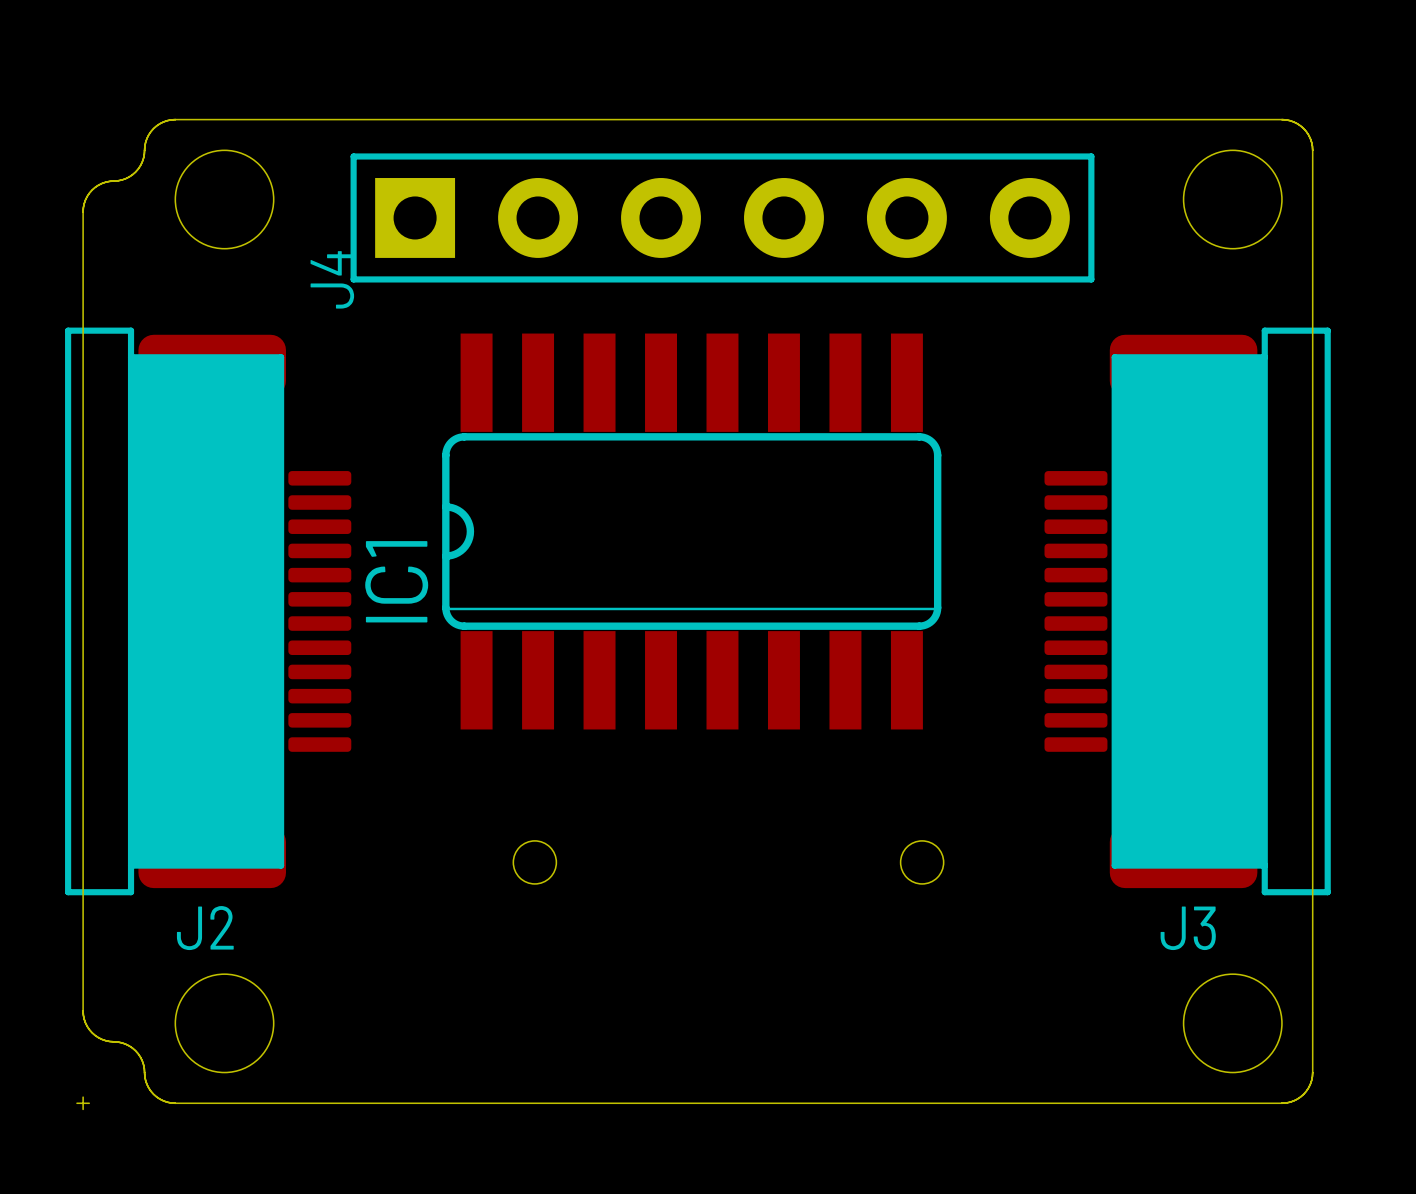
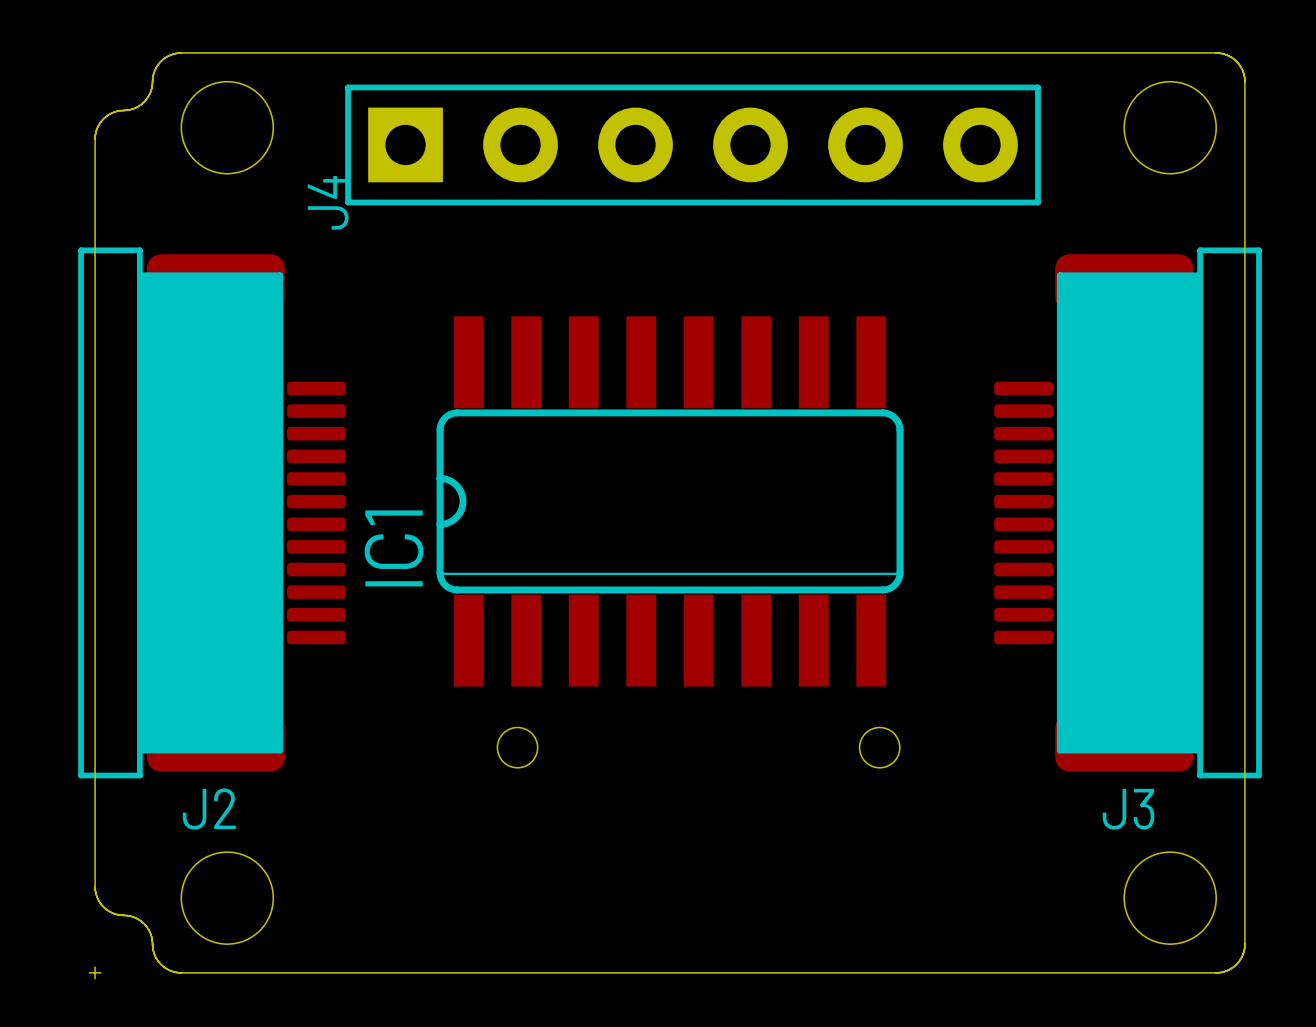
IC1 position: (691, 531) -> (670, 501)

